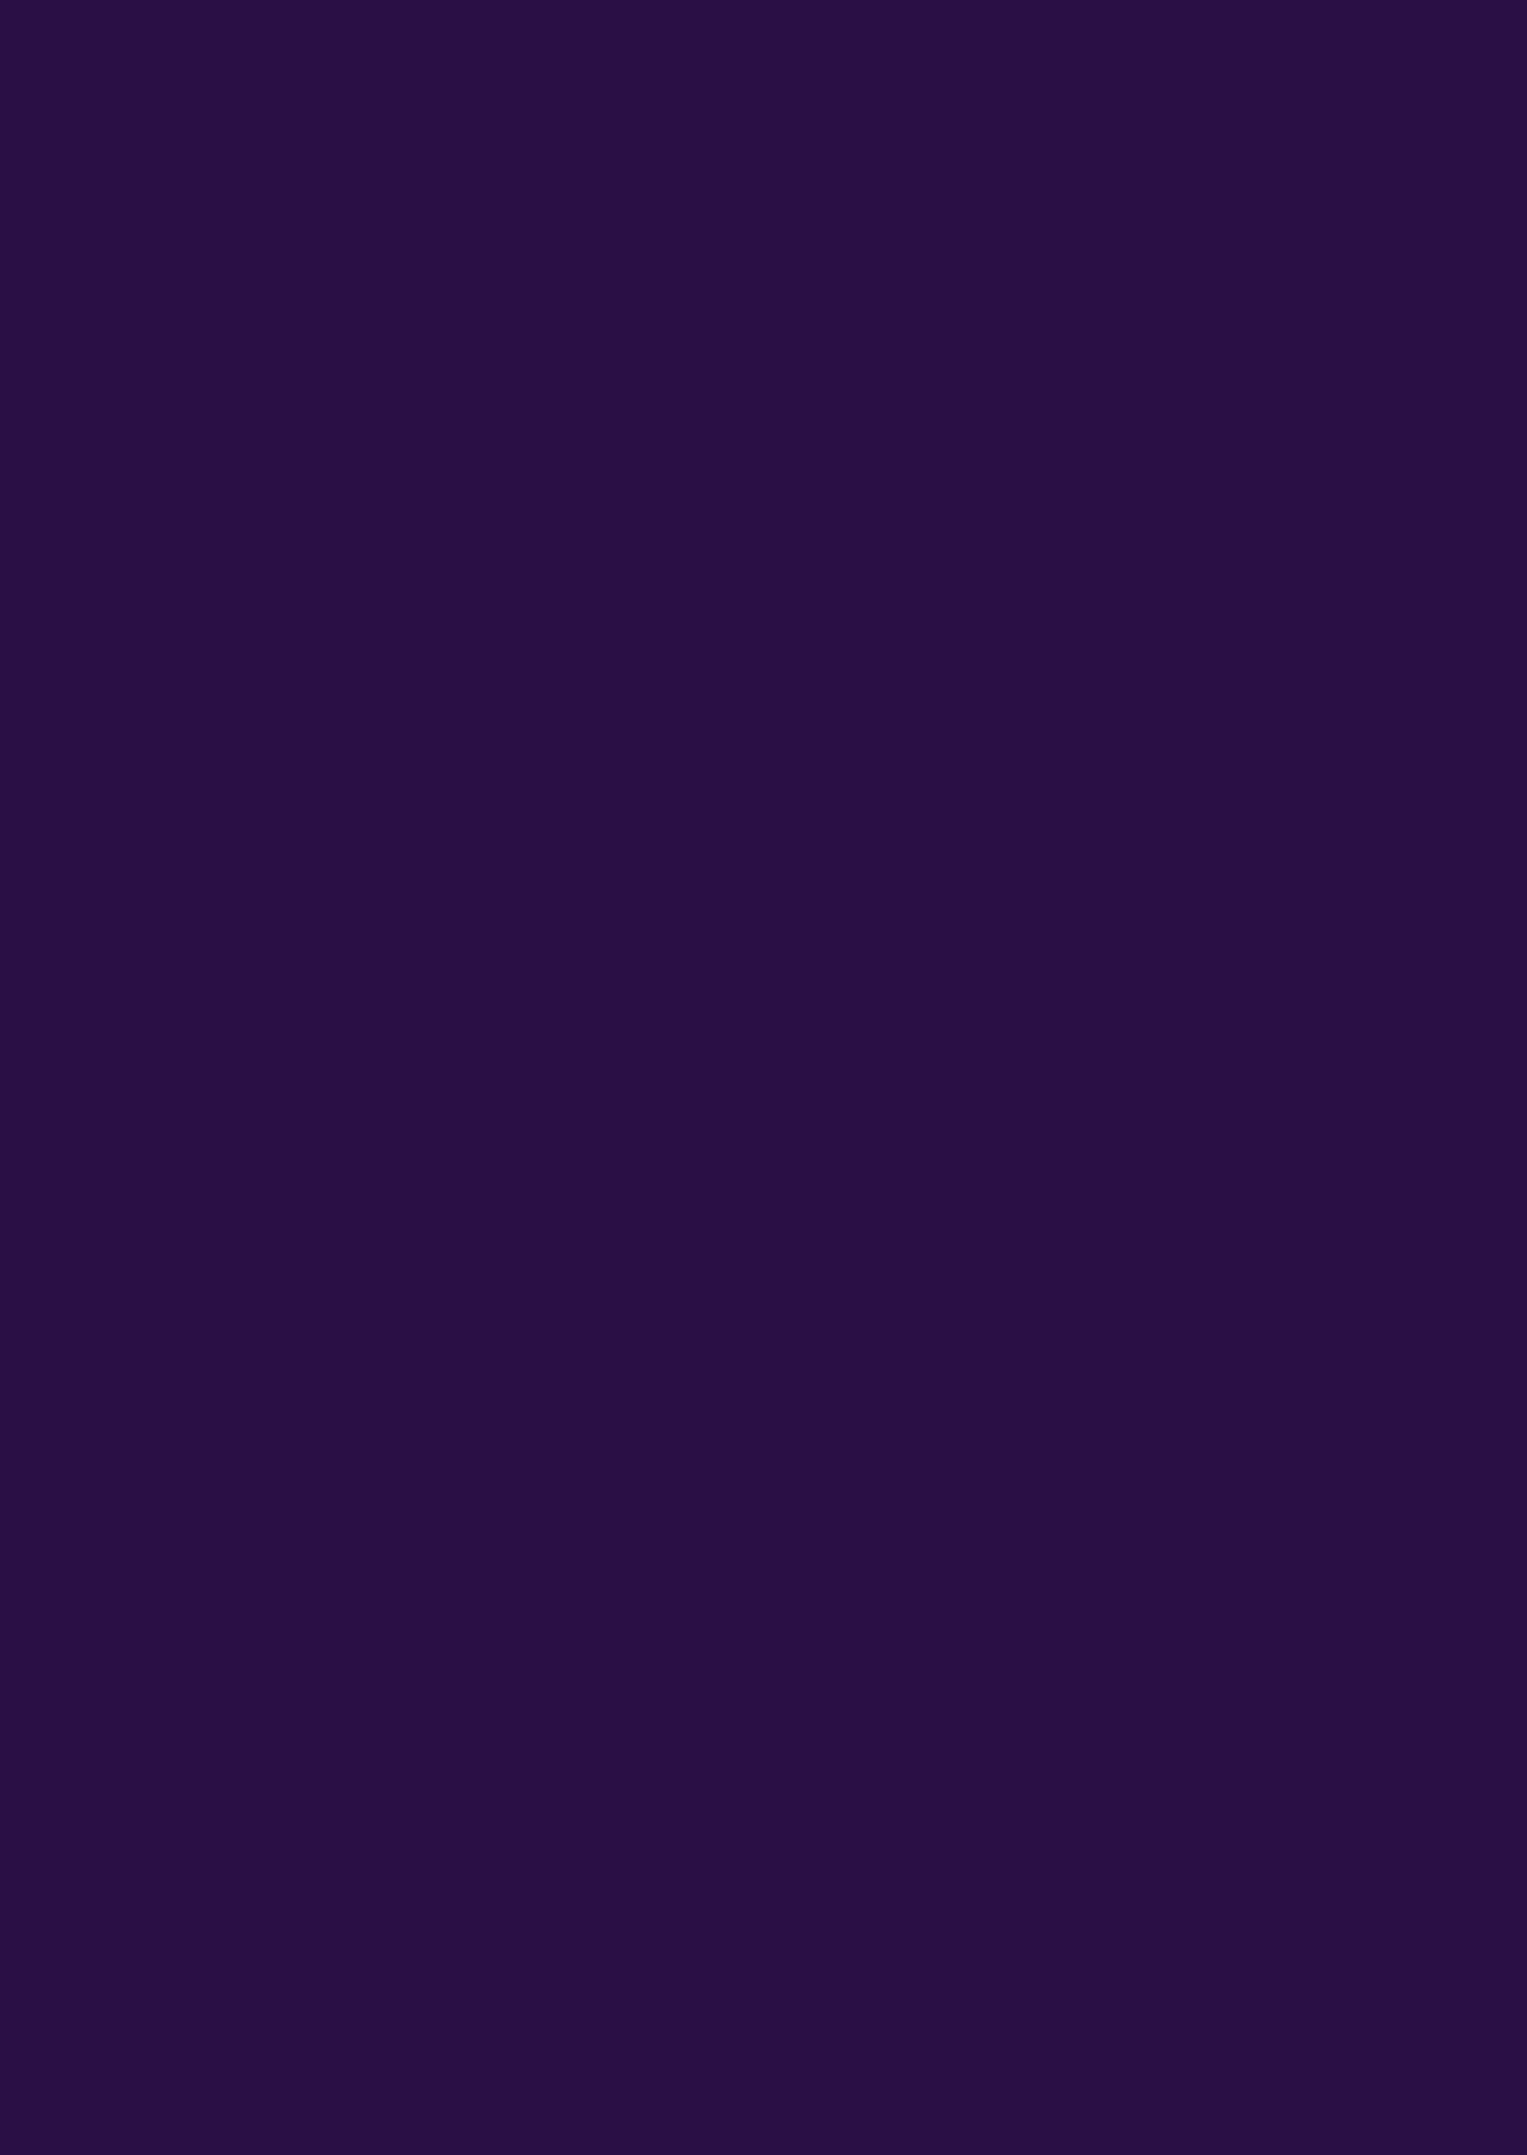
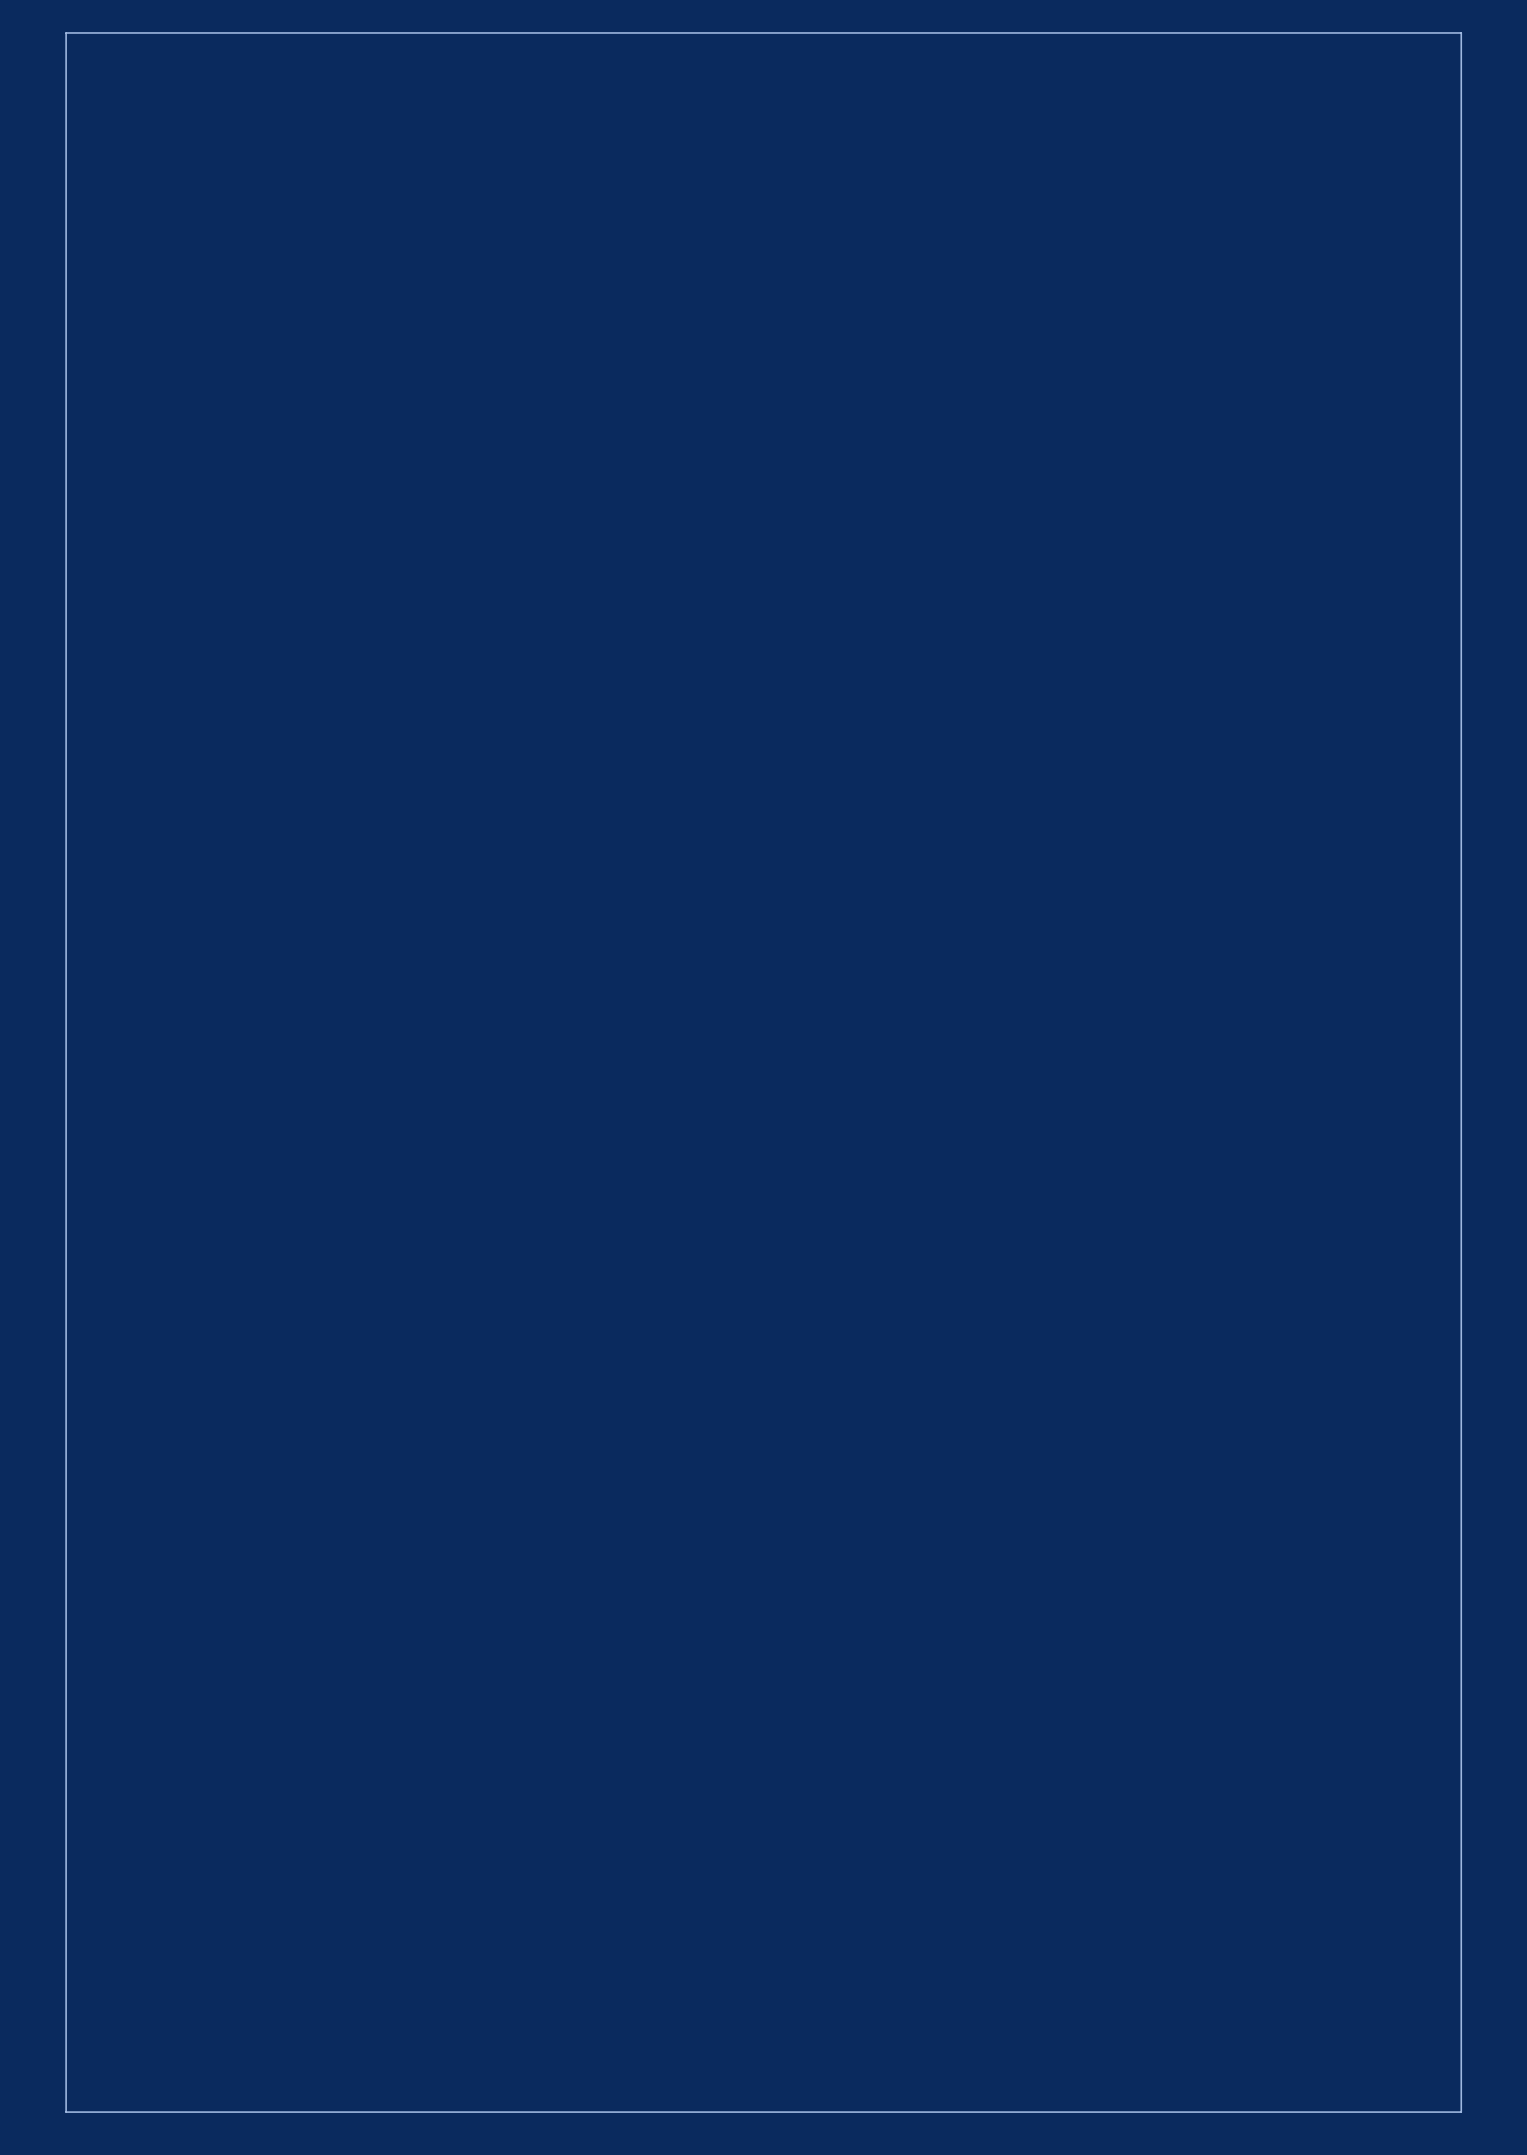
line: none -> (66, 32) (1461, 32) (1461, 2112) (66, 2112) (66, 32)

